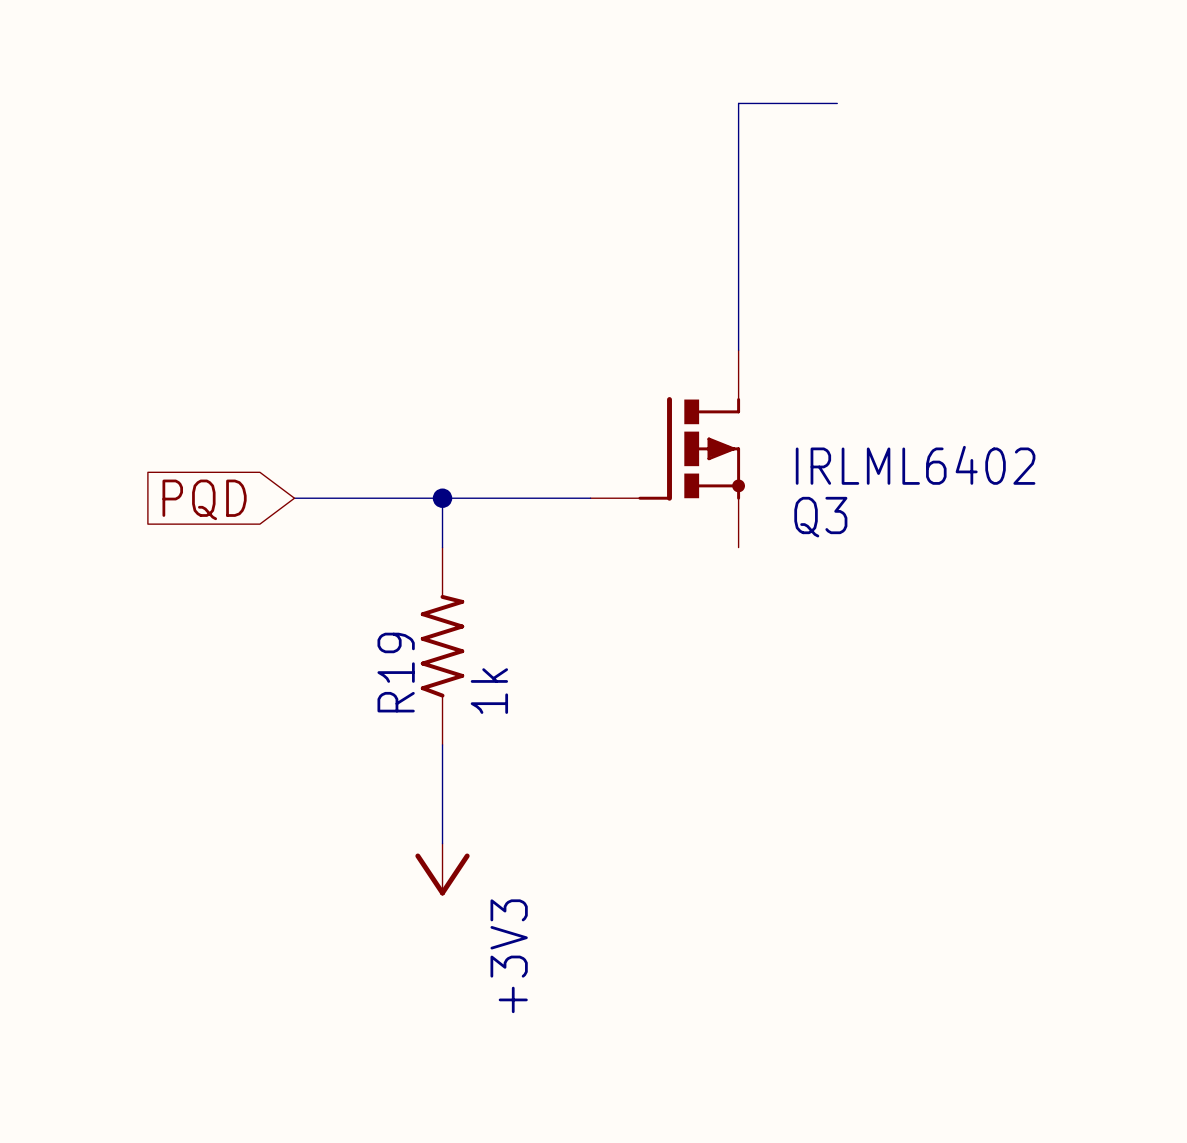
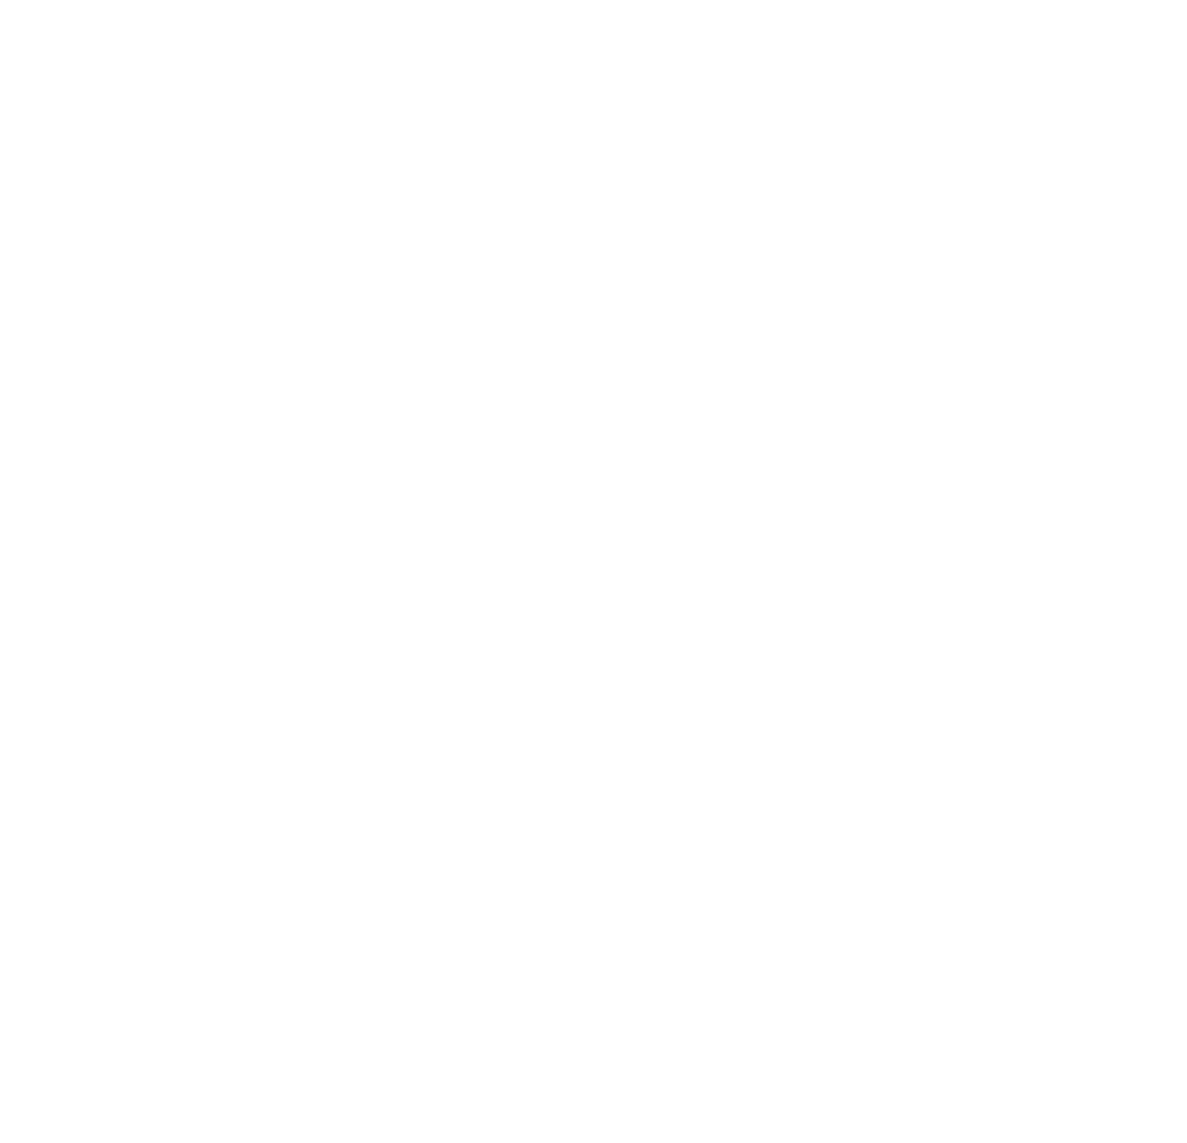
wire: (837, 103) (738, 103) (738, 350) -> none
Q3: IRLML6402 (667, 448) -> none
wire: (294, 498) (590, 498) -> none
wire: (442, 498) (442, 547) -> none
junction: (442, 498) -> none
global label: PQD (204, 499) -> none
R19: 1k (442, 646) -> none
wire: (442, 744) (442, 843) -> none
power symbol: +3V3 (442, 869) -> none

